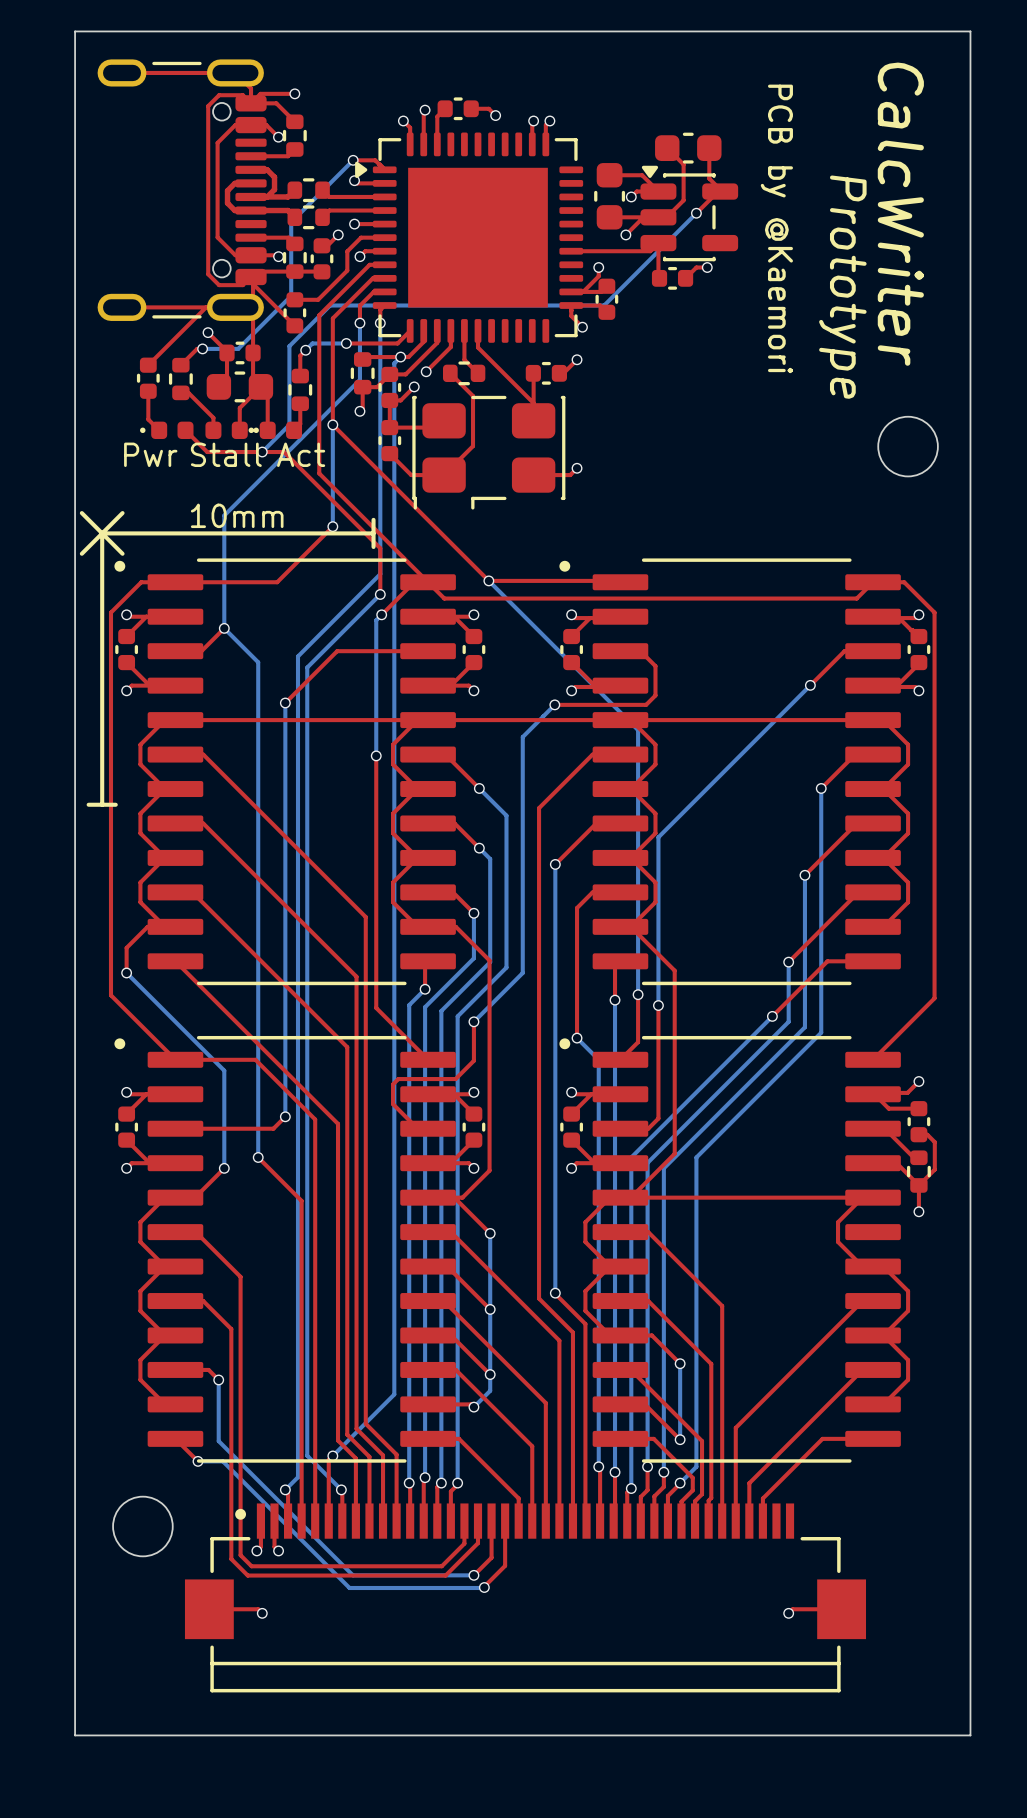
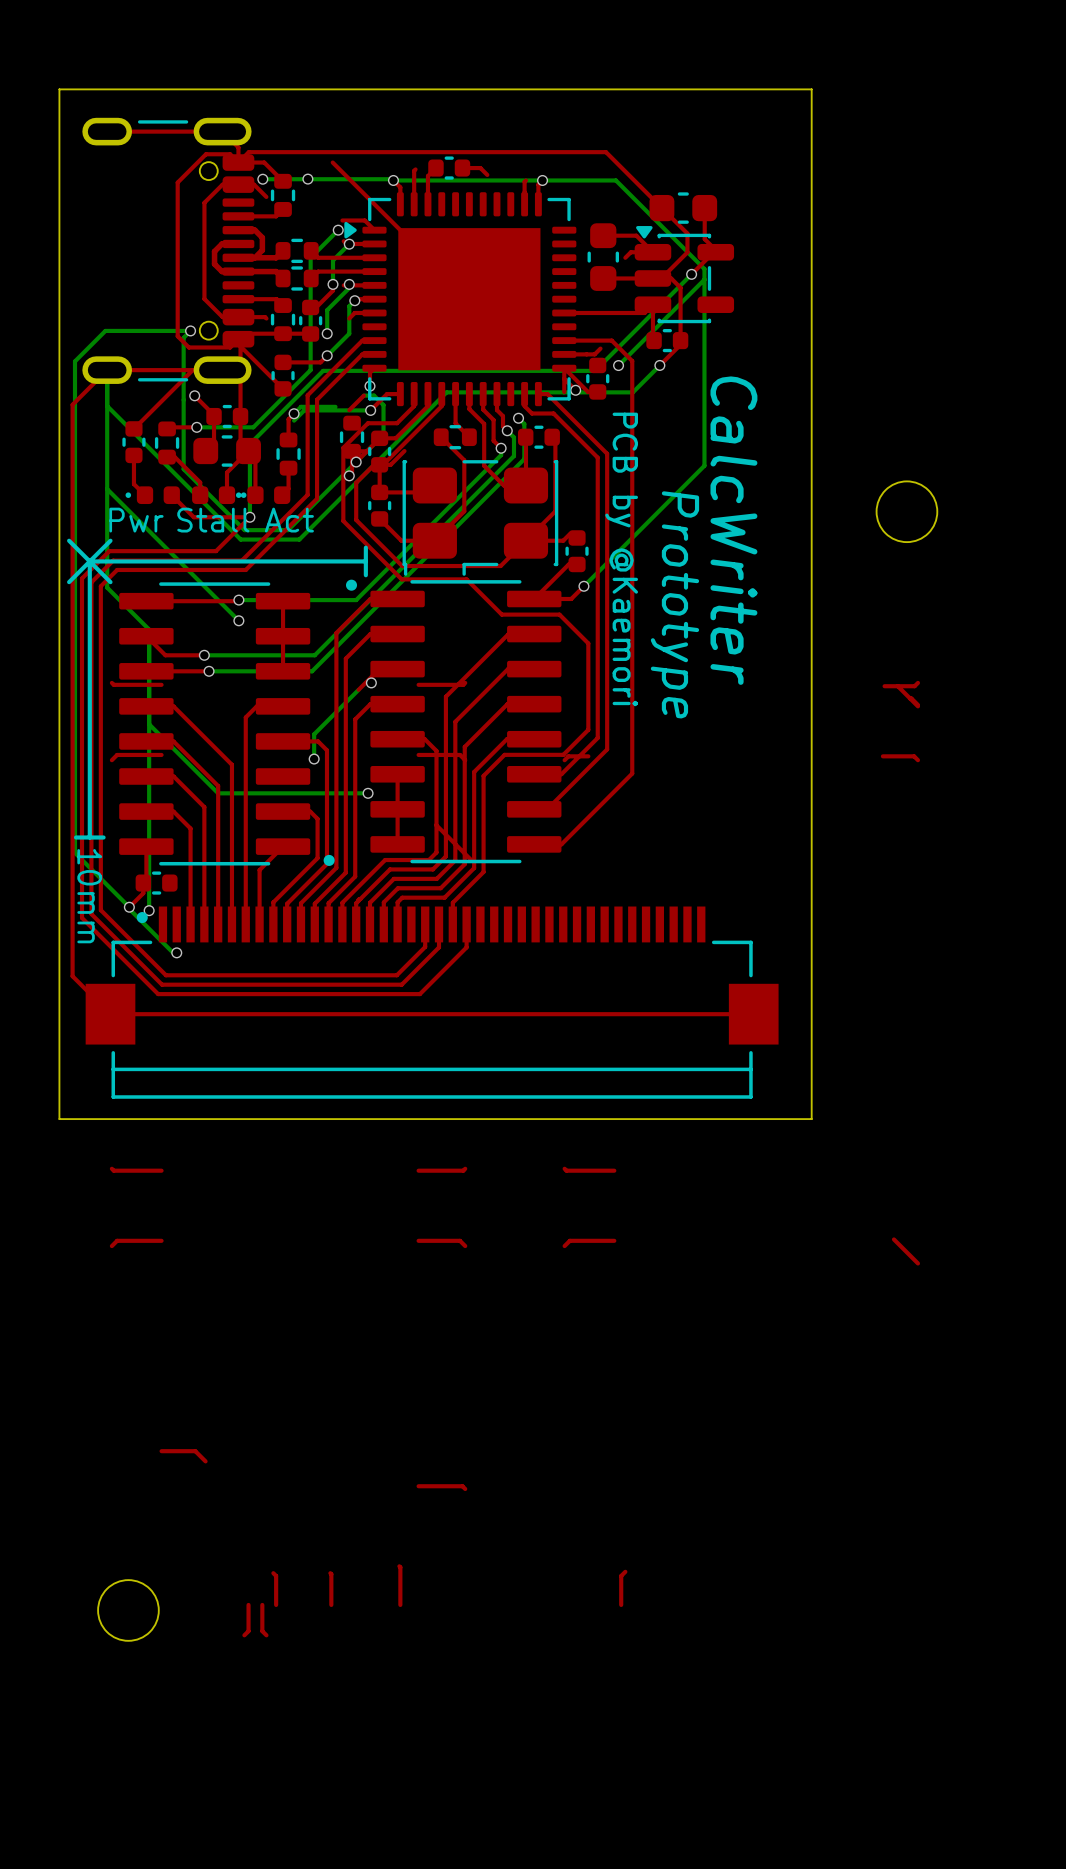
board edge: (814, 31) (970, 31) (970, 1735) (75, 1735) (75, 1043) -> (811, 89) (811, 1119) (59, 1119)
top track: (260, 93) (294, 93) -> (248, 152) (606, 152) (687, 233) (687, 252) (661, 278)
via: (294, 93) -> none
top track: (219, 95) (208, 106) (208, 274) (219, 285) -> (205, 154) (177, 182) (177, 336) (188, 347) (205, 347)
top track: none -> (332, 162) (469, 299)
via: (425, 110) -> none
via: (495, 115) -> none
bottom track: none -> (262, 179) (615, 180) (704, 269) (704, 465) (583, 586)
via: none -> (262, 179)
via: none -> (307, 179)
via: (533, 120) -> none
via: (278, 137) -> none
top track: (667, 148) (683, 164) (683, 200) (666, 217) -> none
bottom track: (353, 160) (291, 222) (291, 295) (238, 348) (202, 348) -> none
via: (353, 160) -> none
bottom track: none -> (338, 230) (310, 257) (310, 370) (253, 427) (196, 427)
via: none -> (338, 230)
via: (354, 180) -> none
bottom track: none -> (349, 244) (333, 260) (333, 284)
via: none -> (349, 244)
via: (631, 196) -> none
text position: CalcWriter (900, 214) -> CalcWriter (733, 530)
top track: (643, 217) (625, 234) -> (637, 278) (671, 278) (680, 287) (680, 340)
bottom track: none -> (704, 279) (618, 365)
top track: none -> (333, 284) (333, 290) (327, 296)
via: none -> (333, 284)
bottom track: none -> (349, 284) (349, 288) (327, 310) (327, 333)
via: none -> (349, 284)
via: (354, 224) -> none
text position: PCB by @Kaemori (776, 228) -> PCB by @Kaemori (621, 559)
via: (338, 234) -> none
via: (625, 234) -> none
top track: (366, 237) (361, 237) (347, 251) (347, 270) (318, 299) -> (327, 355) (320, 362) (306, 362)
bottom track: none -> (354, 300) (349, 306) (349, 333) (327, 355)
via: none -> (354, 300)
via: (278, 256) -> none
via: (359, 256) -> none
top track: (384, 264) (369, 264) (319, 315) (319, 473) (444, 598) (856, 598) (873, 582) (904, 582) (934, 612) (934, 998) (873, 1059) -> none
top track: (598, 267) (598, 276) (583, 291) -> none
via: (598, 267) -> none
top track: (707, 267) (696, 267) (685, 278) -> none
via: (707, 267) -> none
via: none -> (190, 330)
via: none -> (327, 333)
top track: none -> (564, 340) (611, 340) (632, 361) (632, 773) (561, 844) (534, 844)
top track: none -> (680, 344) (659, 365)
text position: Prototype (842, 287) -> Prototype (674, 604)
top track: (373, 291) (359, 305) (359, 323) -> (363, 354) (317, 399) (317, 498) (245, 569) (117, 569) (100, 586) (100, 910) (165, 975) (396, 975) (425, 946) (425, 924)
via: none -> (327, 355)
part position: (606, 299) -> (597, 378)
via: none -> (618, 365)
bottom track: none -> (659, 365) (632, 392) (446, 392) (299, 539) (240, 539) (107, 406)
via: none -> (659, 365)
top track: (571, 305) (600, 305) (606, 312) -> (564, 368) (588, 391) (597, 391)
bottom track: (604, 305) (330, 305) (289, 346) (289, 424) (262, 452) -> (597, 368) (595, 370) (323, 370) (249, 444) (249, 517)
top track: none -> (107, 370) (72, 404) (72, 976) (110, 1014) (753, 1014)
bottom track: none -> (107, 370) (107, 587) (149, 629) (149, 910)
top track: (332, 318) (332, 424) (488, 580) (617, 580) -> (321, 381) (307, 395) (307, 494) (241, 560) (113, 560) (91, 582) (91, 914) (162, 984) (401, 984) (439, 947) (439, 924)
bottom track: (359, 323) (359, 379) (224, 515) (224, 628) (258, 662) (258, 1157) -> none
via: (359, 323) -> none
bottom track: (380, 323) (380, 574) (297, 656) (297, 1477) (285, 1489) -> none
top track: (410, 330) (397, 343) (346, 343) -> (400, 394) (386, 394) (370, 410)
top track: none -> (483, 394) (483, 409) (493, 420) (493, 440) (501, 448)
top track: none -> (496, 394) (496, 410) (503, 416) (503, 426) (507, 430)
top track: none -> (524, 394) (524, 406) (531, 413) (553, 413) (597, 457) (597, 737) (561, 774) (534, 774)
top track: none -> (538, 394) (547, 394) (607, 453) (607, 749) (547, 809)
top track: none -> (363, 395) (349, 410)
bottom track: none -> (363, 395) (374, 395) (383, 405) (383, 434) (288, 530) (244, 530) (183, 469) (183, 337) (190, 330) (105, 330) (75, 361) (75, 852) (173, 952) (176, 952)
top track: (423, 341) (408, 357) (365, 357) -> (414, 405) (397, 423) (367, 423) (343, 447) (343, 520) (401, 579) (466, 579) (501, 614) (559, 614) (588, 643) (588, 729) (563, 754) (504, 754) (483, 775) (483, 872) (452, 902) (452, 924)
top track: (450, 342) (450, 347) (426, 371) -> (441, 406) (383, 464)
via: (346, 343) -> none
top track: (478, 345) (533, 403) -> (469, 409) (484, 423) (484, 465) (503, 485) (525, 485)
bottom track: none -> (370, 410) (304, 410) (294, 420)
via: none -> (370, 410)
top track: (202, 348) (197, 348) (180, 365) -> none
via position: (202, 348) -> (196, 427)
bottom track: none -> (518, 418) (524, 424) (524, 459) (312, 671) (209, 671)
via: none -> (518, 418)
bottom track: (400, 357) (394, 363) (394, 1394) (332, 1455) -> none
via: (400, 357) -> none
top track: (577, 359) (563, 373) -> none
via: (577, 359) -> none
top track: none -> (168, 427) (196, 427)
bottom track: none -> (507, 430) (513, 437) (513, 456) (314, 655) (204, 655)
via: none -> (507, 430)
via: (426, 371) -> none
top track: none -> (555, 440) (555, 511) (500, 566) (402, 566) (356, 519) (356, 482) (374, 464)
bottom track: none -> (501, 448) (501, 455) (356, 600) (238, 600)
via: none -> (501, 448)
via: (414, 386) -> none
via: none -> (356, 462)
bottom track: none -> (107, 489) (238, 620)
bottom track: (332, 424) (332, 526) -> none
via: (332, 424) -> none
top track: (262, 452) (283, 452) (380, 548) (380, 594) -> (249, 517) (216, 551) (109, 551) (82, 578) (82, 917) (158, 994) (419, 994) (466, 947) (466, 924)
via: (577, 468) -> none
top track: none -> (577, 564) (568, 564) (534, 598) (571, 598) (583, 586)
line: (81, 513) (122, 553) -> (69, 540) (110, 582)
line: (122, 513) (81, 553) -> (110, 540) (69, 582)
text rotation: 0° (237, 515) -> 90° clockwise (89, 896)
text position: 10mm (237, 515) -> 10mm (89, 896)
line: (373, 519) (373, 546) -> (365, 547) (365, 575)
via: none -> (583, 586)
top track: (332, 526) (277, 582) (141, 582) (110, 612) (110, 995) (175, 1059) (255, 1059) (315, 1119) (315, 1521) -> none
via: (332, 526) -> none
top track: none -> (397, 598) (370, 598) (336, 632) (336, 867) (300, 903) (300, 924)
top track: none -> (238, 600) (146, 601)
via: none -> (238, 600)
line: (373, 533) (102, 533) (102, 804) -> (365, 561) (89, 561) (89, 837)
top track: none -> (283, 601) (283, 671)
via: none -> (238, 620)
top track: none -> (397, 634) (370, 634) (345, 658) (345, 872) (314, 903) (314, 924)
top track: none -> (534, 634) (508, 634) (445, 696) (445, 856) (432, 869) (390, 869) (356, 903) (356, 924)
top track: none -> (146, 636) (165, 655) (204, 655)
bottom track: (488, 580) (638, 730) (638, 994) -> none
via: (488, 580) -> none
top track: (414, 582) (381, 614) -> none
via: none -> (204, 655)
bottom track: (380, 594) (307, 667) (307, 1455) (341, 1489) -> none
via: (380, 594) -> none
top track: none -> (534, 669) (508, 669) (455, 721) (455, 860) (436, 878) (393, 878) (370, 902) (370, 924)
top track: none -> (146, 671) (209, 671)
via: none -> (209, 671)
via: (126, 614) -> none
bottom track: (381, 614) (376, 620) (376, 755) -> none
via: (473, 614) -> none
top track: (571, 614) (574, 618) (597, 618) -> none
via: (571, 614) -> none
via: (918, 614) -> none
top track: (146, 616) (126, 636) -> (379, 669) (358, 689)
top track: (454, 616) (473, 636) -> none
top track: (590, 618) (571, 636) -> none
bottom track: none -> (358, 689) (314, 734) (314, 759)
top track: (224, 628) (201, 651) (175, 651) -> none
via: (224, 628) -> none
part footprint: [462, 628, 486, 671] -> [345, 579, 562, 864]
top track: none -> (397, 704) (370, 704) (355, 719) (355, 876) (328, 903) (328, 924)
top track: none -> (534, 704) (507, 704) (464, 746) (464, 864) (440, 888) (397, 888) (383, 902) (383, 924)
top track: none -> (146, 706) (173, 706) (231, 764) (231, 924)
top track: none -> (283, 706) (256, 706) (245, 717) (245, 924)
part: (126, 649) -> none
part position: (571, 649) -> (577, 551)
part: (918, 649) -> none
top track: (428, 651) (337, 651) (285, 703) -> none
top track: (640, 651) (655, 666) (655, 695) (646, 704) (554, 704) -> none
top track: (873, 651) (844, 651) (810, 685) -> none
bottom track: none -> (149, 724) (218, 793) (368, 793)
part: none -> (226, 724)
top track: (126, 662) (149, 685) -> none
top track: (473, 662) (450, 685) -> none
top track: (571, 662) (596, 686) -> none
top track: (918, 663) (895, 686) -> none
top track: none -> (397, 739) (424, 739) (436, 750) (436, 852) (429, 860) (385, 860) (342, 902) (342, 924)
top track: none -> (534, 739) (506, 739) (474, 771) (474, 868) (444, 897) (402, 897) (397, 902) (397, 924)
top track: none -> (146, 741) (173, 741) (218, 786) (218, 924)
top track: none -> (283, 741) (318, 741) (326, 750) (326, 863) (287, 903) (287, 924)
bottom track: (810, 685) (658, 837) (658, 1005) -> none
via: (810, 685) -> none
via: none -> (314, 759)
via: (126, 690) -> none
via: (473, 690) -> none
via: (571, 690) -> none
via: (918, 690) -> none
bottom track: (285, 703) (285, 1116) -> none
via: (285, 703) -> none
top track: none -> (397, 774) (397, 844)
bottom track: (554, 704) (522, 737) (522, 972) (473, 1021) -> none
via: (554, 704) -> none
top track: none -> (146, 776) (173, 776) (204, 807) (204, 924)
top track: (165, 720) (140, 744) (140, 764) (165, 789) (140, 813) (140, 833) (165, 857) (140, 882) (140, 902) (165, 926) -> none
top track: (175, 720) (873, 720) -> none
top track: (417, 720) (393, 744) (393, 764) (417, 789) (393, 813) (393, 833) (417, 857) (393, 882) (393, 902) (417, 926) -> none
top track: (630, 720) (655, 744) (655, 764) (630, 789) (655, 813) (655, 833) (630, 857) (655, 882) (655, 902) (630, 926) (674, 970) (674, 1153) (630, 1197) -> none
top track: (883, 720) (908, 744) (908, 764) (883, 789) (908, 813) (908, 833) (883, 857) (908, 882) (908, 902) (883, 926) -> none
top track: none -> (146, 811) (173, 811) (190, 828) (190, 924)
top track: none -> (283, 811) (310, 811) (317, 818) (317, 858) (273, 902) (273, 924)
top track: (175, 754) (203, 754) (365, 917) (365, 1423) (396, 1454) (396, 1521) -> none
top track: (620, 754) (592, 754) (539, 808) (539, 1298) (572, 1332) (572, 1521) -> none
top track: (855, 754) (821, 788) -> none
top track: (376, 755) (376, 1007) (428, 1059) -> none
via position: (376, 755) -> (368, 793)
part: (285, 771) -> none
part: (730, 771) -> none
top track: none -> (283, 846) (259, 870) (259, 924)
bottom track: (479, 788) (506, 815) (506, 967) (457, 1016) (457, 1483) -> none
via: (479, 788) -> none
bottom track: (821, 788) (821, 1032) (696, 1157) (696, 1466) (680, 1483) -> none
via: (821, 788) -> none
line: (88, 804) (115, 804) -> (75, 837) (103, 837)
top track: none -> (143, 883) (143, 893) (129, 907)
part: none -> (156, 883)
top track: (175, 823) (203, 823) (356, 976) (356, 1428) (383, 1455) (383, 1521) -> none
top track: (428, 823) (454, 823) (479, 848) -> none
top track: (596, 823) (555, 864) -> none
top track: (856, 823) (804, 875) -> none
via: none -> (129, 907)
via: none -> (149, 910)
bottom track: (479, 848) (490, 859) (490, 962) (441, 1010) (441, 1483) -> none
via: (479, 848) -> none
bottom track: (555, 864) (555, 1293) -> none
via: (555, 864) -> none
bottom track: (804, 875) (804, 1027) (663, 1168) (663, 1472) -> none
via: (804, 875) -> none
via: none -> (176, 952)
top track: (192, 892) (347, 1047) (347, 1434) (369, 1456) (369, 1521) -> none
top track: (453, 892) (473, 913) -> none
top track: (620, 892) (592, 892) (577, 908) (577, 1038) -> none
top track: (858, 892) (788, 962) -> none
bottom track: (473, 913) (473, 958) (425, 1007) (425, 1477) -> none
via: (473, 913) -> none
top track: (175, 926) (147, 926) (126, 947) (126, 972) -> none
top track: (428, 926) (455, 926) (489, 960) (489, 1170) (462, 1197) (428, 1197) -> none
top track: (175, 961) (338, 1123) (338, 1440) (355, 1458) (355, 1521) -> none
top track: (873, 961) (827, 961) (772, 1016) -> none
bottom track: (788, 962) (788, 1021) (647, 1162) (647, 1466) -> none
via: (788, 962) -> none
top track: (425, 964) (425, 989) -> none
top track: (615, 966) (615, 1000) -> (146, 846) (146, 880)
bottom track: (126, 972) (224, 1070) (224, 1168) -> none
via: (126, 972) -> none
bottom track: (425, 989) (409, 1005) (409, 1483) -> none
via: (425, 989) -> none
top track: (638, 994) (638, 1042) (620, 1059) -> none
via: (638, 994) -> none
bottom track: (615, 1000) (615, 1472) -> none
via: (615, 1000) -> none
top track: (658, 1005) (658, 1118) (648, 1128) (620, 1128) -> none
via: (658, 1005) -> none
bottom track: (772, 1016) (631, 1157) (631, 1488) -> none
via: (772, 1016) -> none
top track: (473, 1021) (473, 1060) (455, 1079) (398, 1079) (393, 1084) (393, 1104) (417, 1128) -> none
via: (473, 1021) -> none
bottom track: (577, 1038) (598, 1059) (598, 1466) -> none
via: (577, 1038) -> none
top track: (918, 1081) (907, 1092) (890, 1092) -> none
via: (918, 1081) -> none
via: (126, 1092) -> none
via: (473, 1092) -> none
via: (571, 1092) -> none
top track: (873, 1092) (888, 1108) (918, 1108) -> none
top track: (146, 1094) (126, 1114) -> none
top track: (454, 1094) (473, 1114) -> none
top track: (591, 1094) (571, 1114) -> none
top track: (285, 1116) (273, 1128) (175, 1128) -> none
via: (285, 1116) -> none
part: (918, 1121) -> none
part: (126, 1127) -> none
part: (473, 1127) -> none
part: (571, 1127) -> none
top track: (883, 1127) (913, 1157) -> none
top track: (918, 1134) (927, 1134) (934, 1142) (934, 1169) (918, 1185) (918, 1211) -> none
top track: (126, 1140) (149, 1163) -> none
top track: (473, 1140) (450, 1163) -> none
top track: (571, 1140) (594, 1163) -> none
top track: (258, 1157) (301, 1200) (301, 1521) -> none
via: (258, 1157) -> none
via: (126, 1168) -> none
top track: (224, 1168) (195, 1197) -> none
via: (224, 1168) -> none
via: (473, 1168) -> none
via: (571, 1168) -> none
part: (918, 1171) -> none
top track: (165, 1197) (140, 1222) (140, 1241) (165, 1266) (140, 1291) (140, 1310) (165, 1335) (140, 1360) (140, 1379) (165, 1404) -> none
top track: (454, 1197) (490, 1233) -> none
top track: (610, 1197) (585, 1222) (585, 1241) (610, 1266) (585, 1291) (585, 1310) (610, 1335) -> none
top track: (620, 1197) (873, 1197) -> none
top track: (862, 1197) (838, 1222) (838, 1241) (862, 1266) -> none
via: (918, 1211) -> none
top track: (195, 1232) (240, 1276) (240, 1555) (251, 1566) (441, 1566) (464, 1543) (464, 1521) -> none
top track: (450, 1232) (559, 1340) (559, 1521) -> none
top track: (620, 1232) (648, 1232) (722, 1306) (722, 1521) -> none
bottom track: (490, 1233) (490, 1390) (473, 1407) -> none
via: (490, 1233) -> none
part: (285, 1249) -> none
part: (730, 1249) -> none
top track: (447, 1266) (490, 1309) -> none
top track: (883, 1266) (908, 1291) (908, 1310) (883, 1335) (908, 1360) (908, 1379) (883, 1404) -> none
top track: (555, 1293) (585, 1323) (585, 1519) -> none
via: (555, 1293) -> none
top track: (175, 1301) (203, 1301) (231, 1329) (231, 1559) (247, 1575) (445, 1575) (478, 1543) (478, 1521) -> none
top track: (443, 1301) (545, 1403) (545, 1521) -> none
top track: (620, 1301) (648, 1301) (711, 1364) (711, 1498) (708, 1500) (708, 1521) -> none
top track: (862, 1301) (735, 1427) (735, 1521) -> none
via: (490, 1309) -> none
top track: (451, 1335) (490, 1374) -> none
top track: (620, 1335) (651, 1335) (680, 1363) -> none
bottom track: (680, 1363) (680, 1439) -> none
via: (680, 1363) -> none
top track: (428, 1369) (455, 1369) (532, 1446) (532, 1521) -> none
top track: (630, 1369) (702, 1441) (702, 1494) (695, 1501) (695, 1521) -> none
top track: (862, 1369) (749, 1483) (749, 1521) -> none
via: (490, 1374) -> none
bottom track: (218, 1379) (218, 1441) (352, 1575) (473, 1575) -> none
via: (218, 1379) -> none
top track: (644, 1404) (680, 1439) -> none
via: (473, 1407) -> none
top track: (175, 1438) (197, 1461) -> none
top track: (428, 1438) (459, 1438) (518, 1498) (518, 1521) -> none
top track: (620, 1438) (653, 1438) (692, 1477) (692, 1490) (681, 1501) (681, 1521) -> none
top track: (873, 1438) (822, 1438) (762, 1498) (762, 1521) -> none
via: (680, 1439) -> none
top track: (332, 1455) (328, 1460) (328, 1521) -> none
via: (332, 1455) -> none
bottom track: (197, 1461) (222, 1461) (349, 1587) (484, 1587) -> none
via: (197, 1461) -> none
top track: (598, 1466) (600, 1521) -> none
via: (598, 1466) -> none
top track: (647, 1466) (647, 1490) (640, 1496) (640, 1521) -> none
via: (647, 1466) -> none
top track: (615, 1472) (615, 1519) -> none
via: (615, 1472) -> none
top track: (663, 1472) (663, 1486) (654, 1496) (654, 1521) -> none
via: (663, 1472) -> none
top track: (425, 1477) (423, 1521) -> none
via: (425, 1477) -> none
via: (409, 1483) -> none
top track: (441, 1483) (437, 1487) (437, 1521) -> none
via: (441, 1483) -> none
top track: (457, 1483) (450, 1491) (450, 1521) -> none
via: (457, 1483) -> none
top track: (680, 1483) (667, 1495) (667, 1521) -> none
via: (680, 1483) -> none
via: (631, 1488) -> none
via: (285, 1489) -> none
via: (341, 1489) -> none
top track: (491, 1521) (491, 1557) (473, 1575) -> none
top track: (505, 1521) (505, 1565) (484, 1587) -> none
via: (256, 1550) -> none
via: (278, 1550) -> none
via: (473, 1575) -> none
via: (484, 1587) -> none
part position: (525, 1597) -> (432, 1002)
top track: (209, 1609) (258, 1609) (262, 1613) -> none
top track: (841, 1609) (792, 1609) (788, 1613) -> none
via: (262, 1613) -> none
via: (788, 1613) -> none

